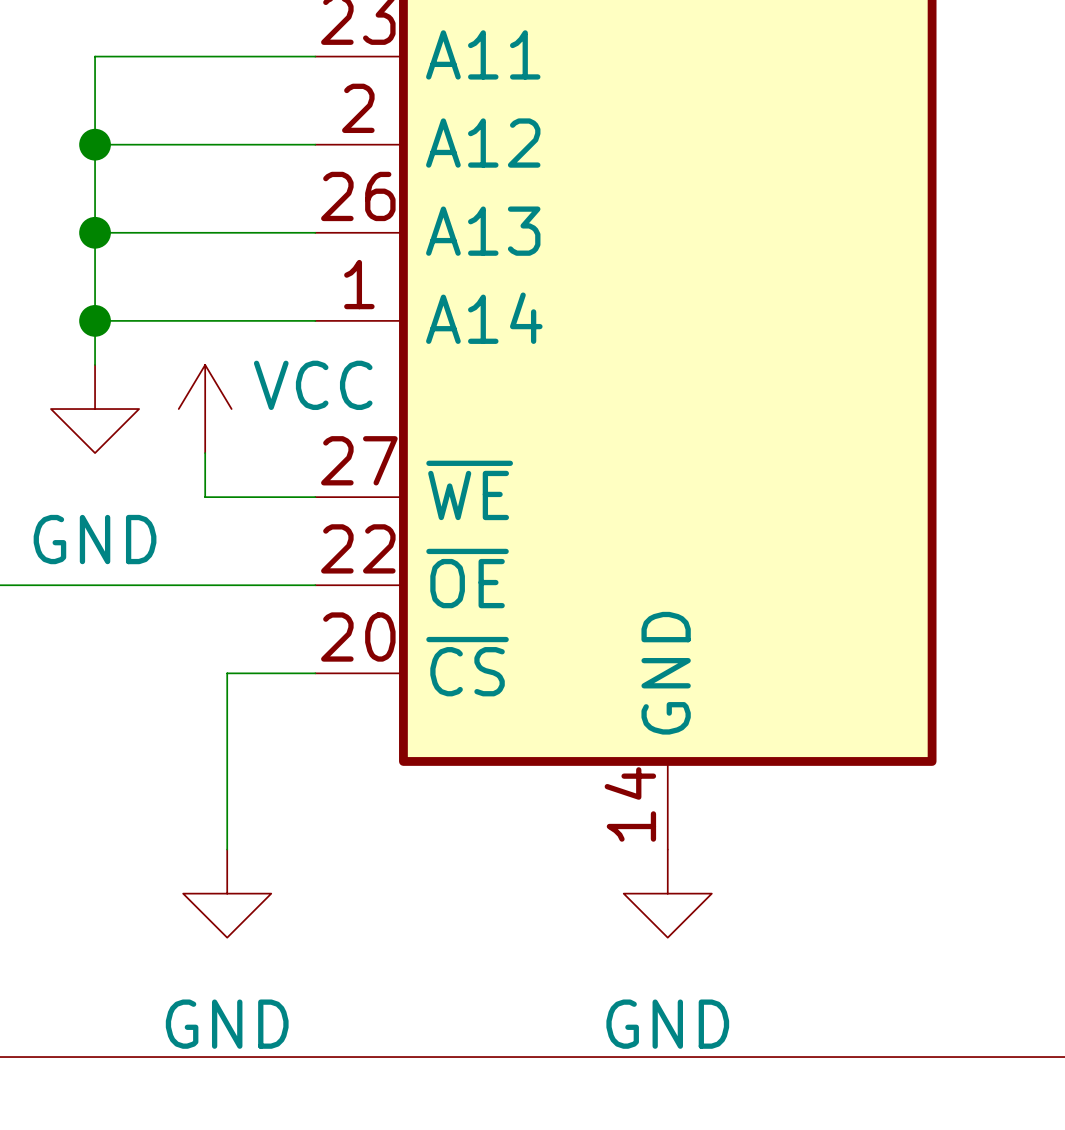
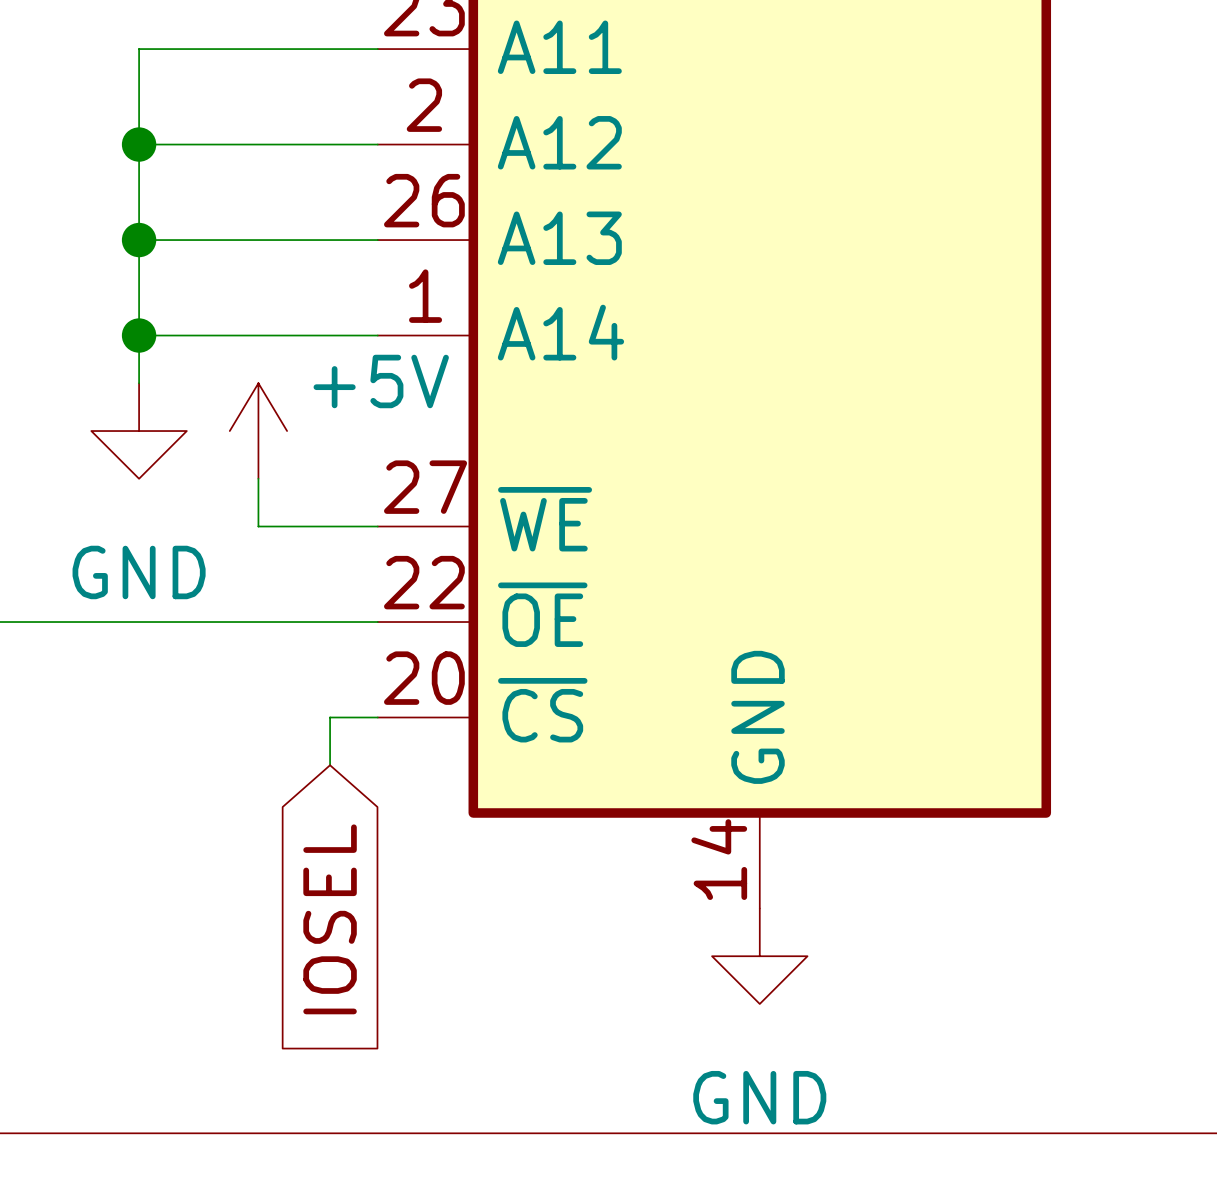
power symbol: VCC (205, 409) -> +5V (258, 431)
wire: (271, 673) (227, 673) (227, 849) -> (330, 717) (330, 765)
global label: none -> IOSEL (330, 919)
power symbol: GND (227, 893) -> none

